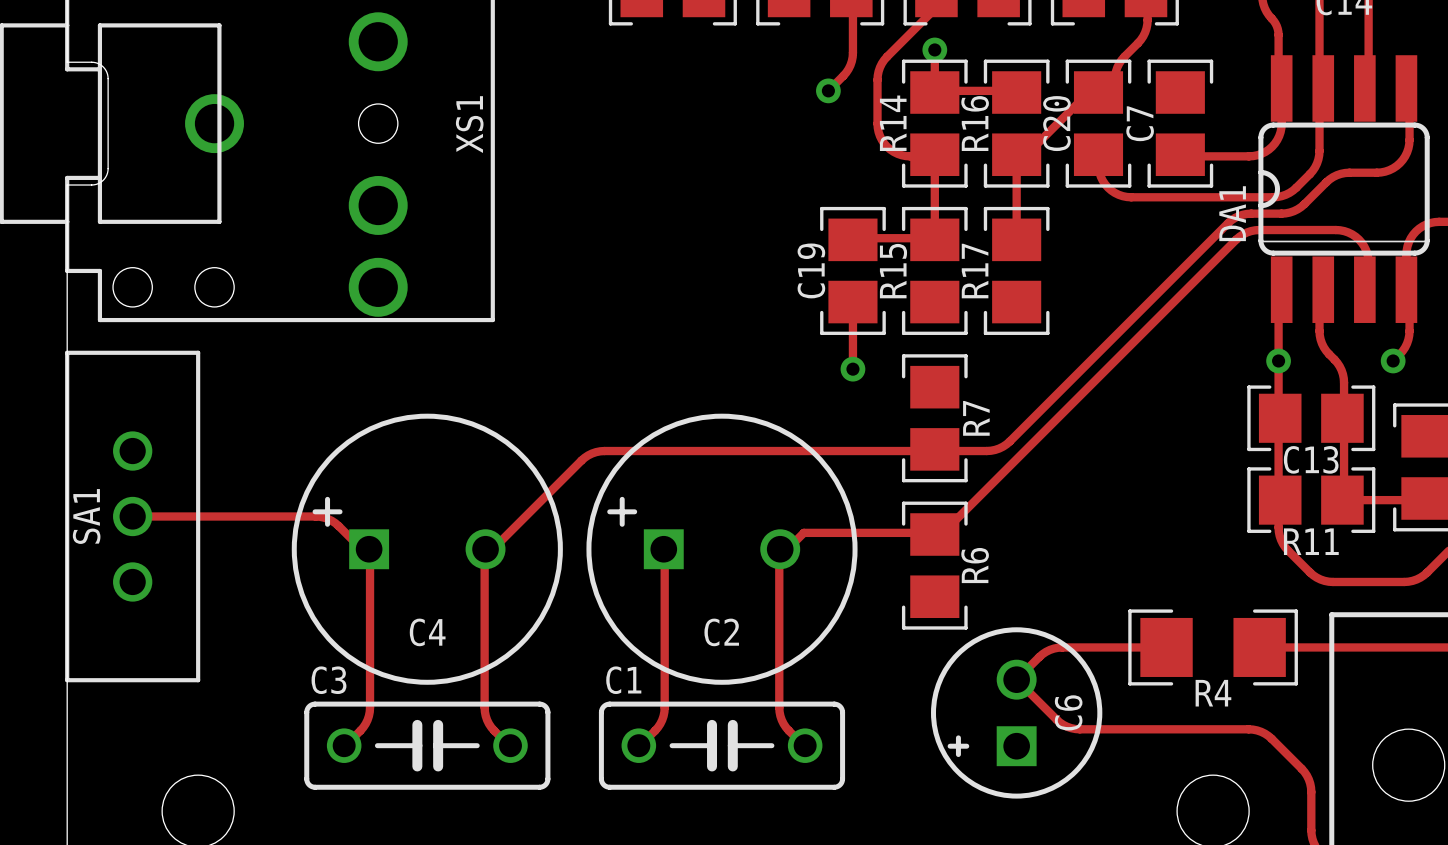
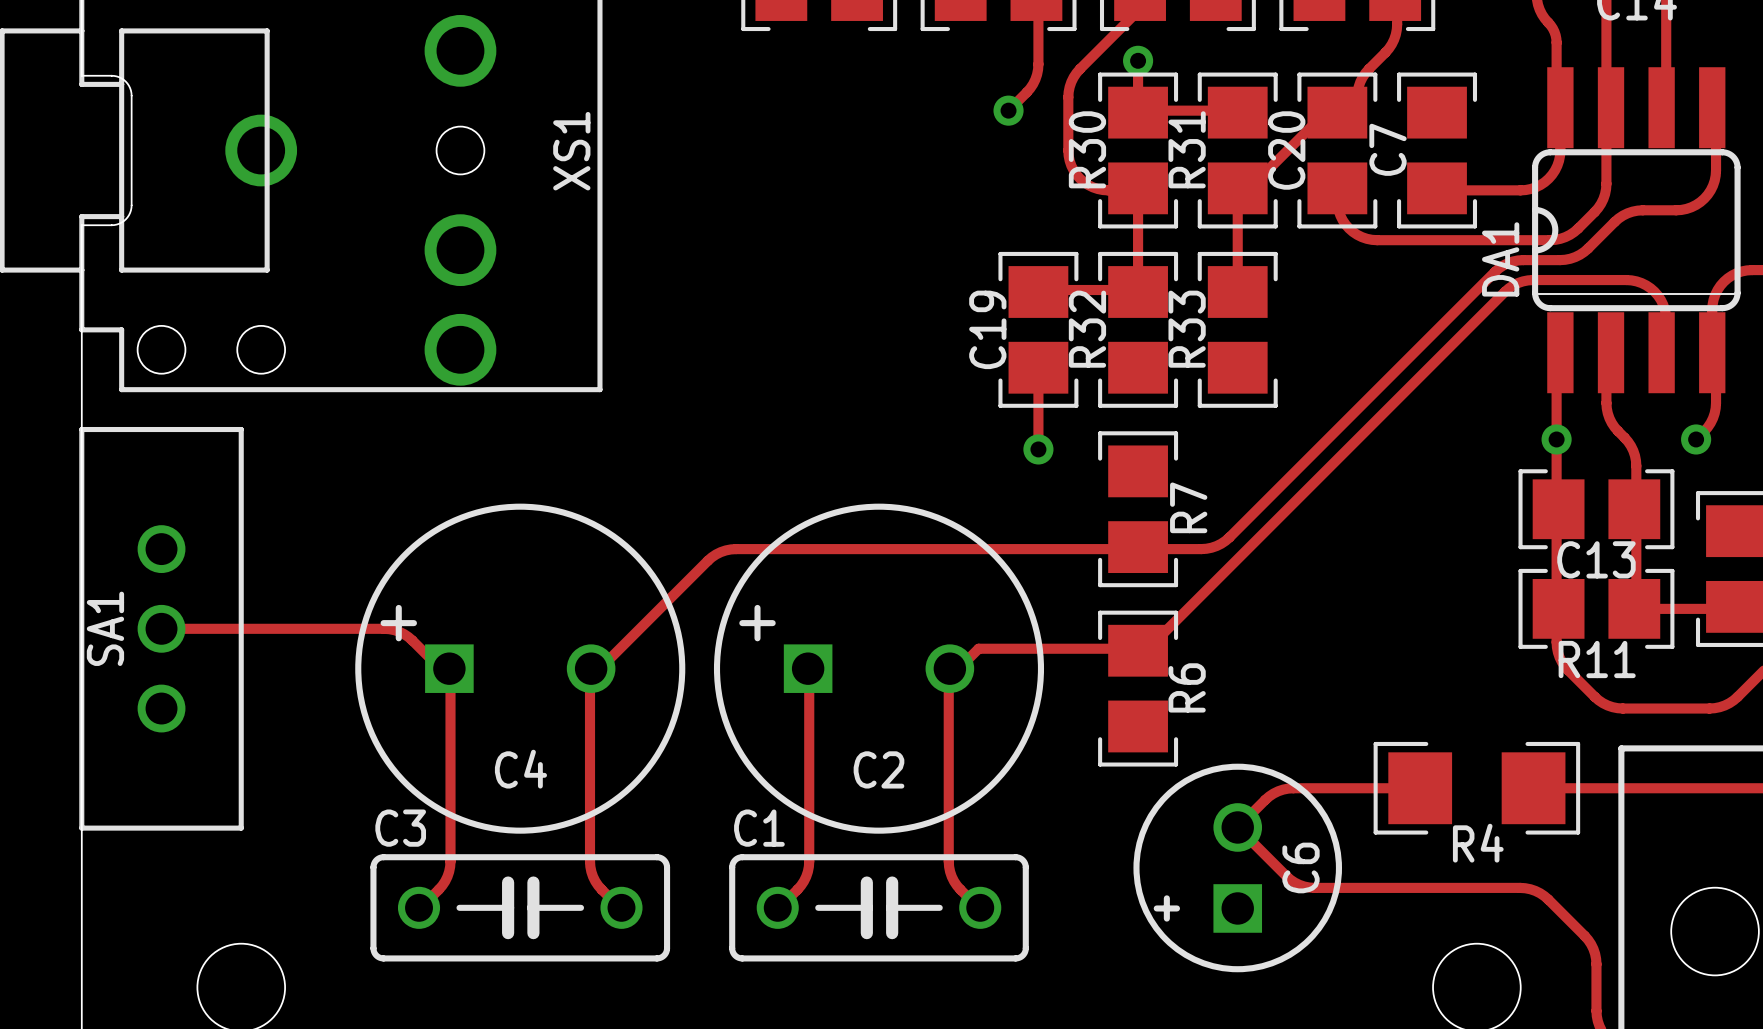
R14 name: R14 (893, 123) -> R30 (1087, 149)
R16 name: R16 (975, 123) -> R31 (1187, 149)
R15 name: R15 (893, 271) -> R32 (1087, 329)
R17 name: R17 (975, 271) -> R33 (1187, 329)

